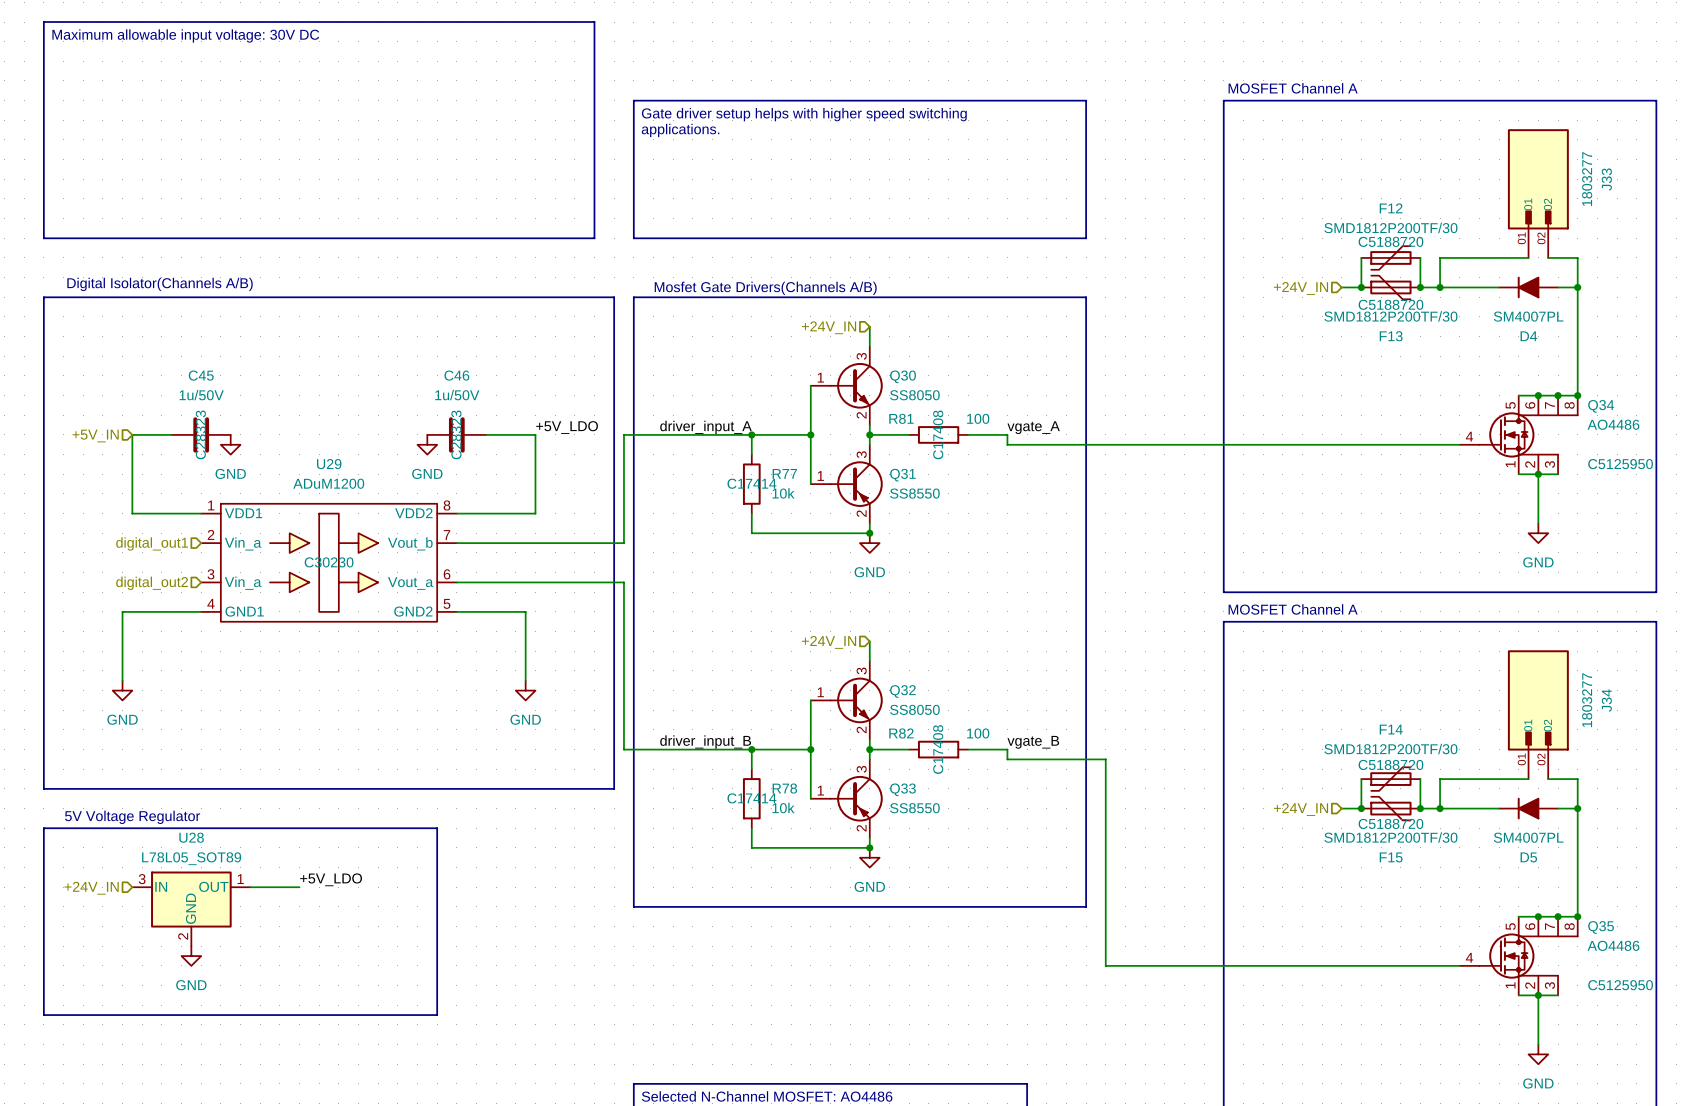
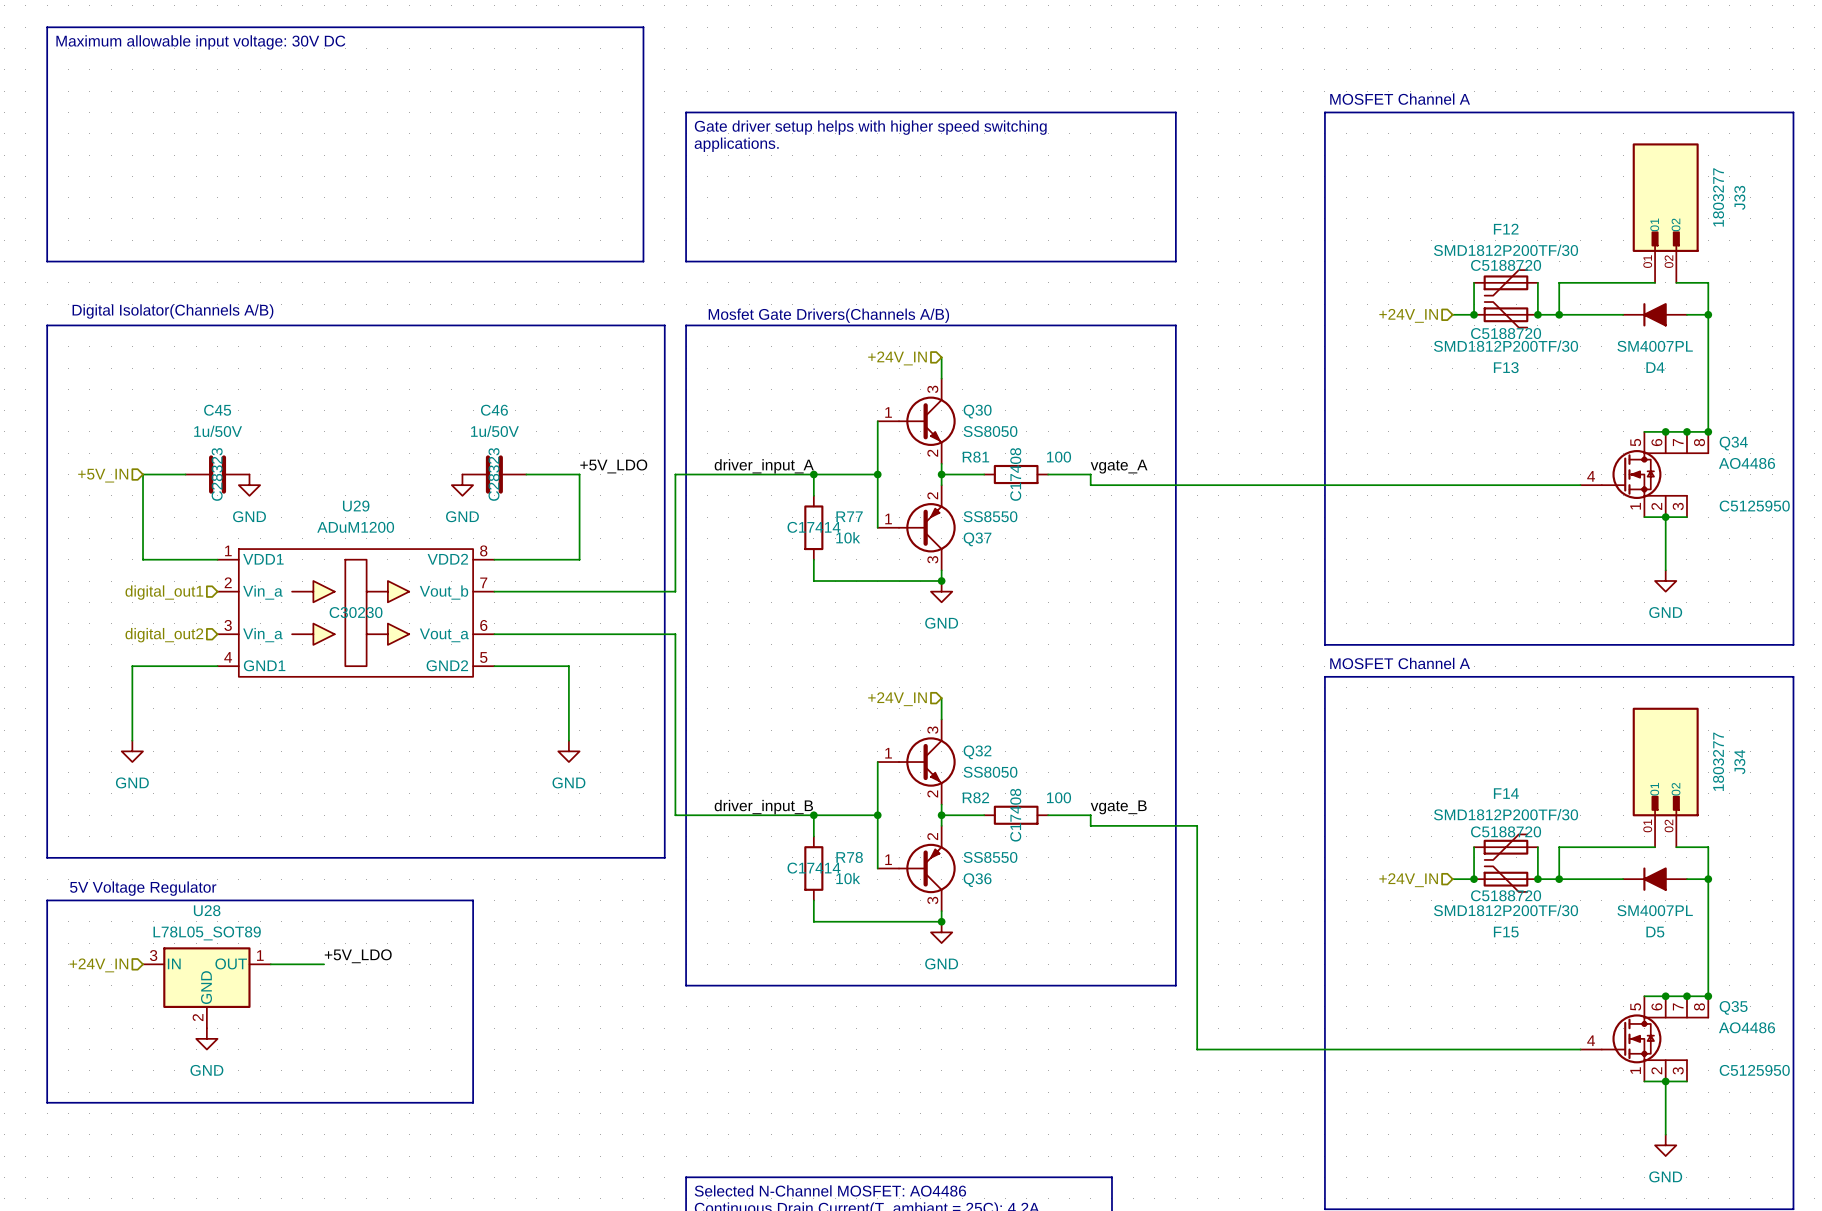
Q31: SS8550 (846, 484) -> none
Q37: none -> SS8550 (916, 527)
Q33: SS8550 (846, 798) -> none
Q36: none -> SS8550 (916, 868)

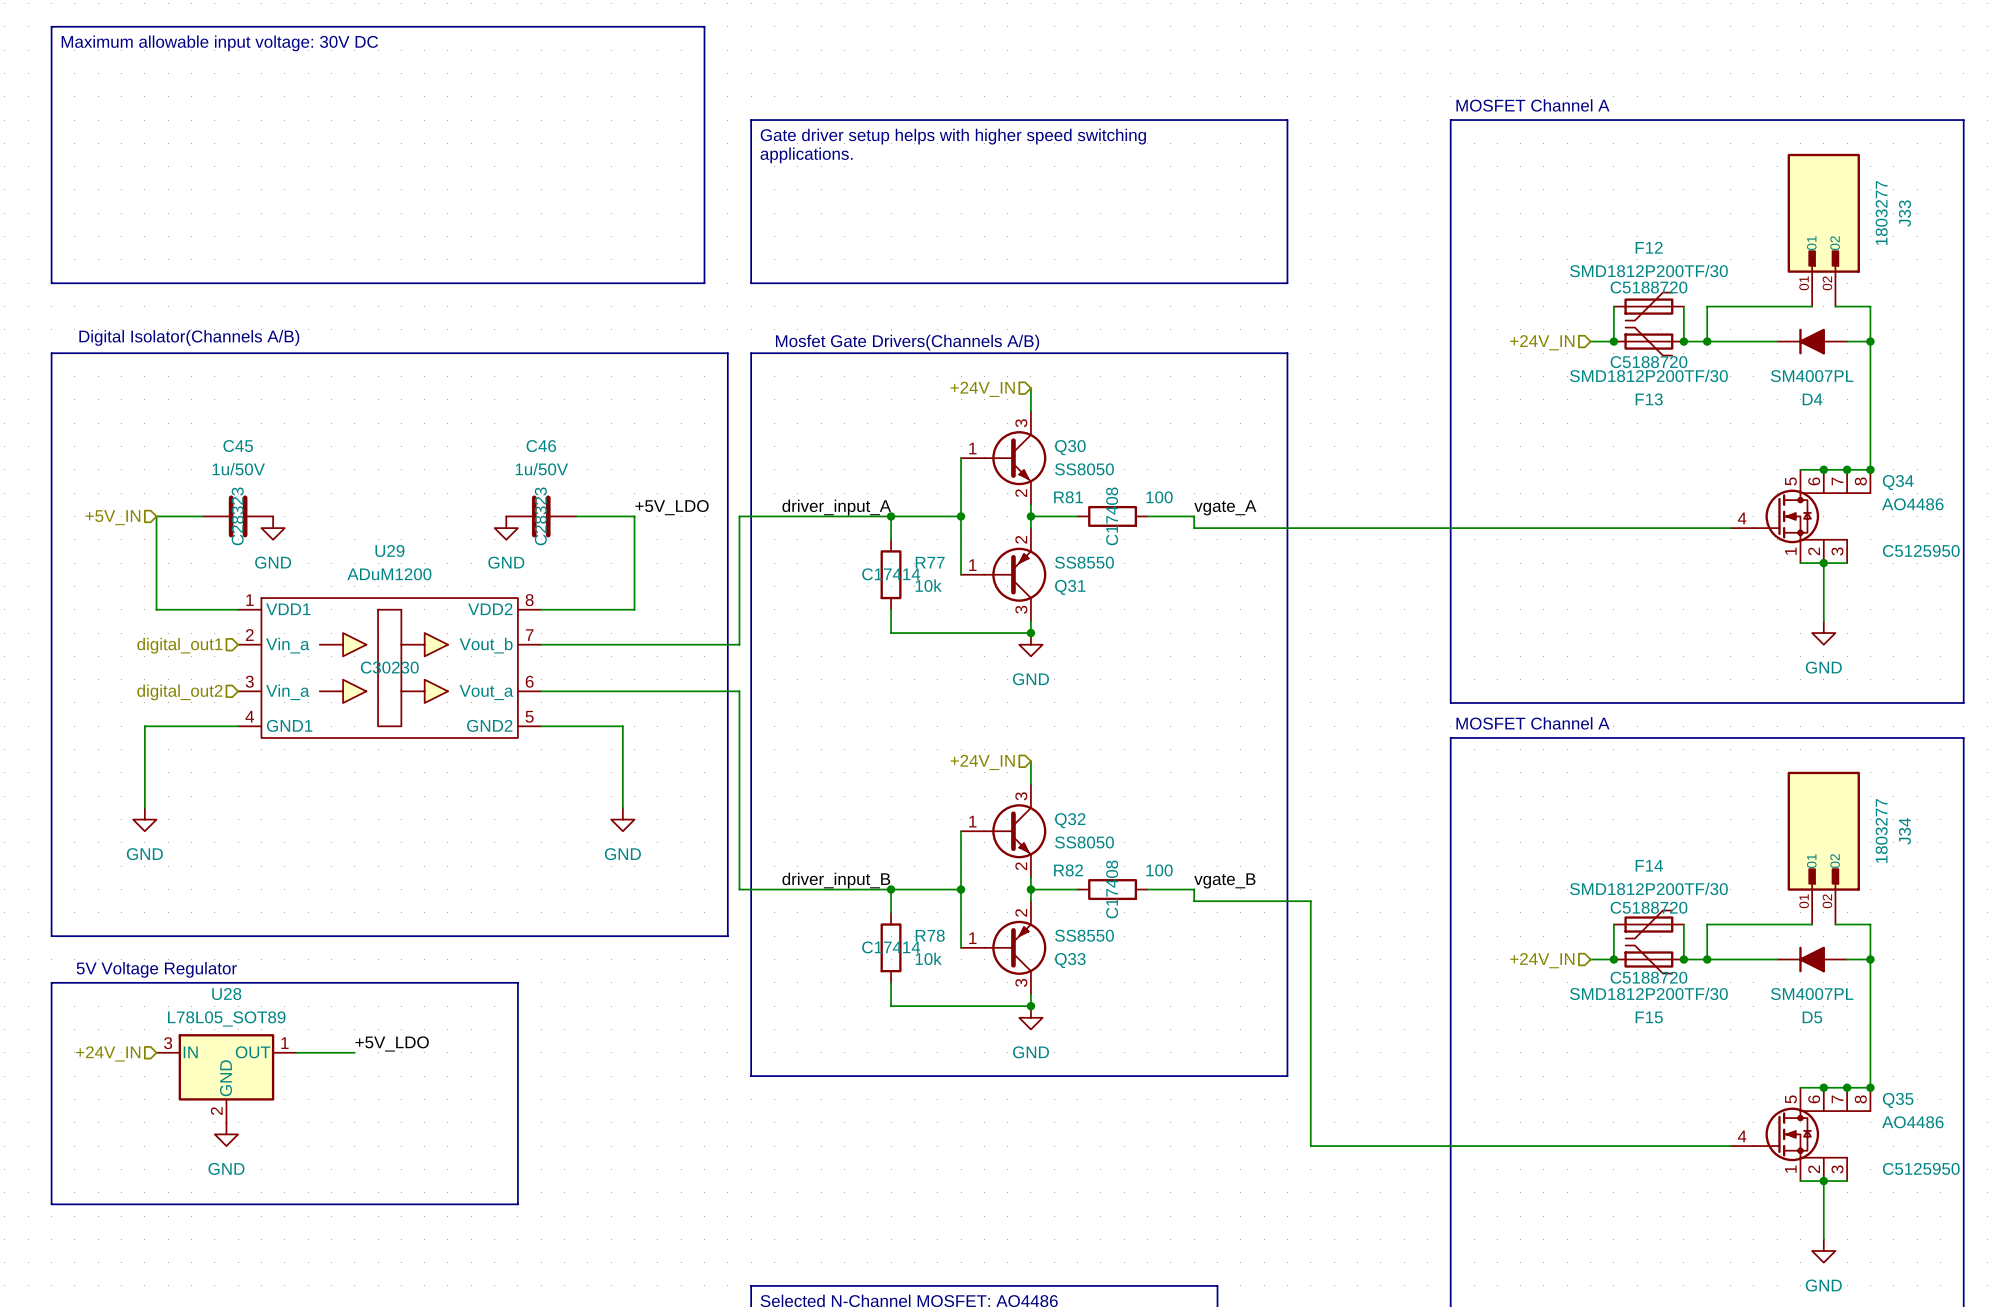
Q37 name: Q37 (977, 539) -> Q31 (1070, 587)
Q36 name: Q36 (977, 880) -> Q33 (1070, 960)

